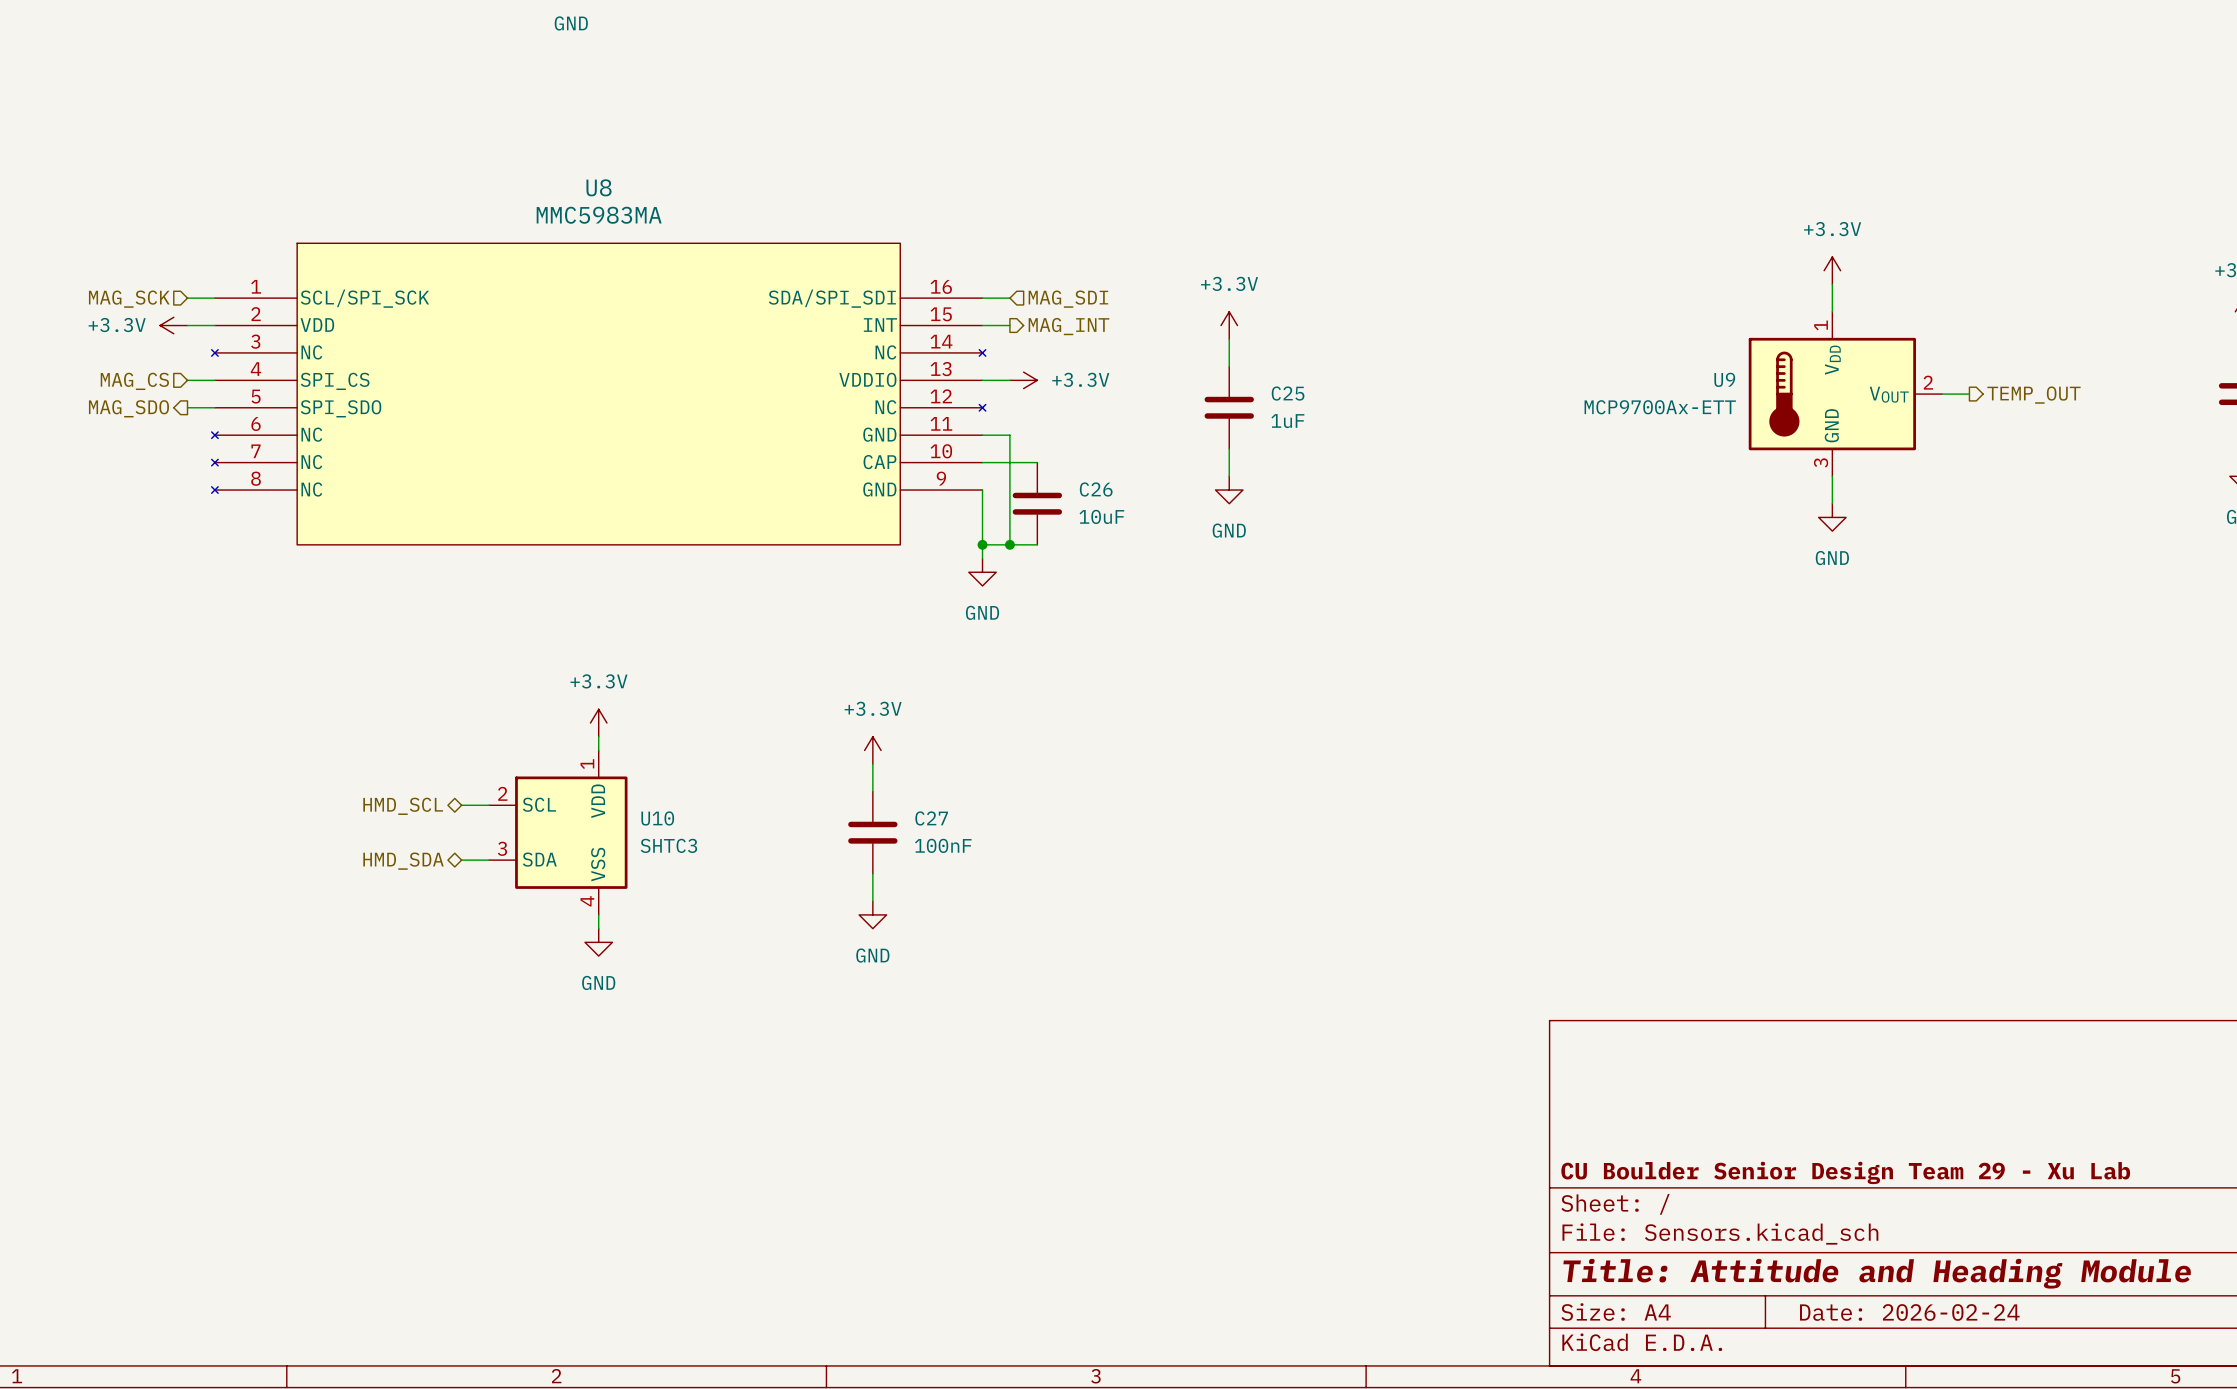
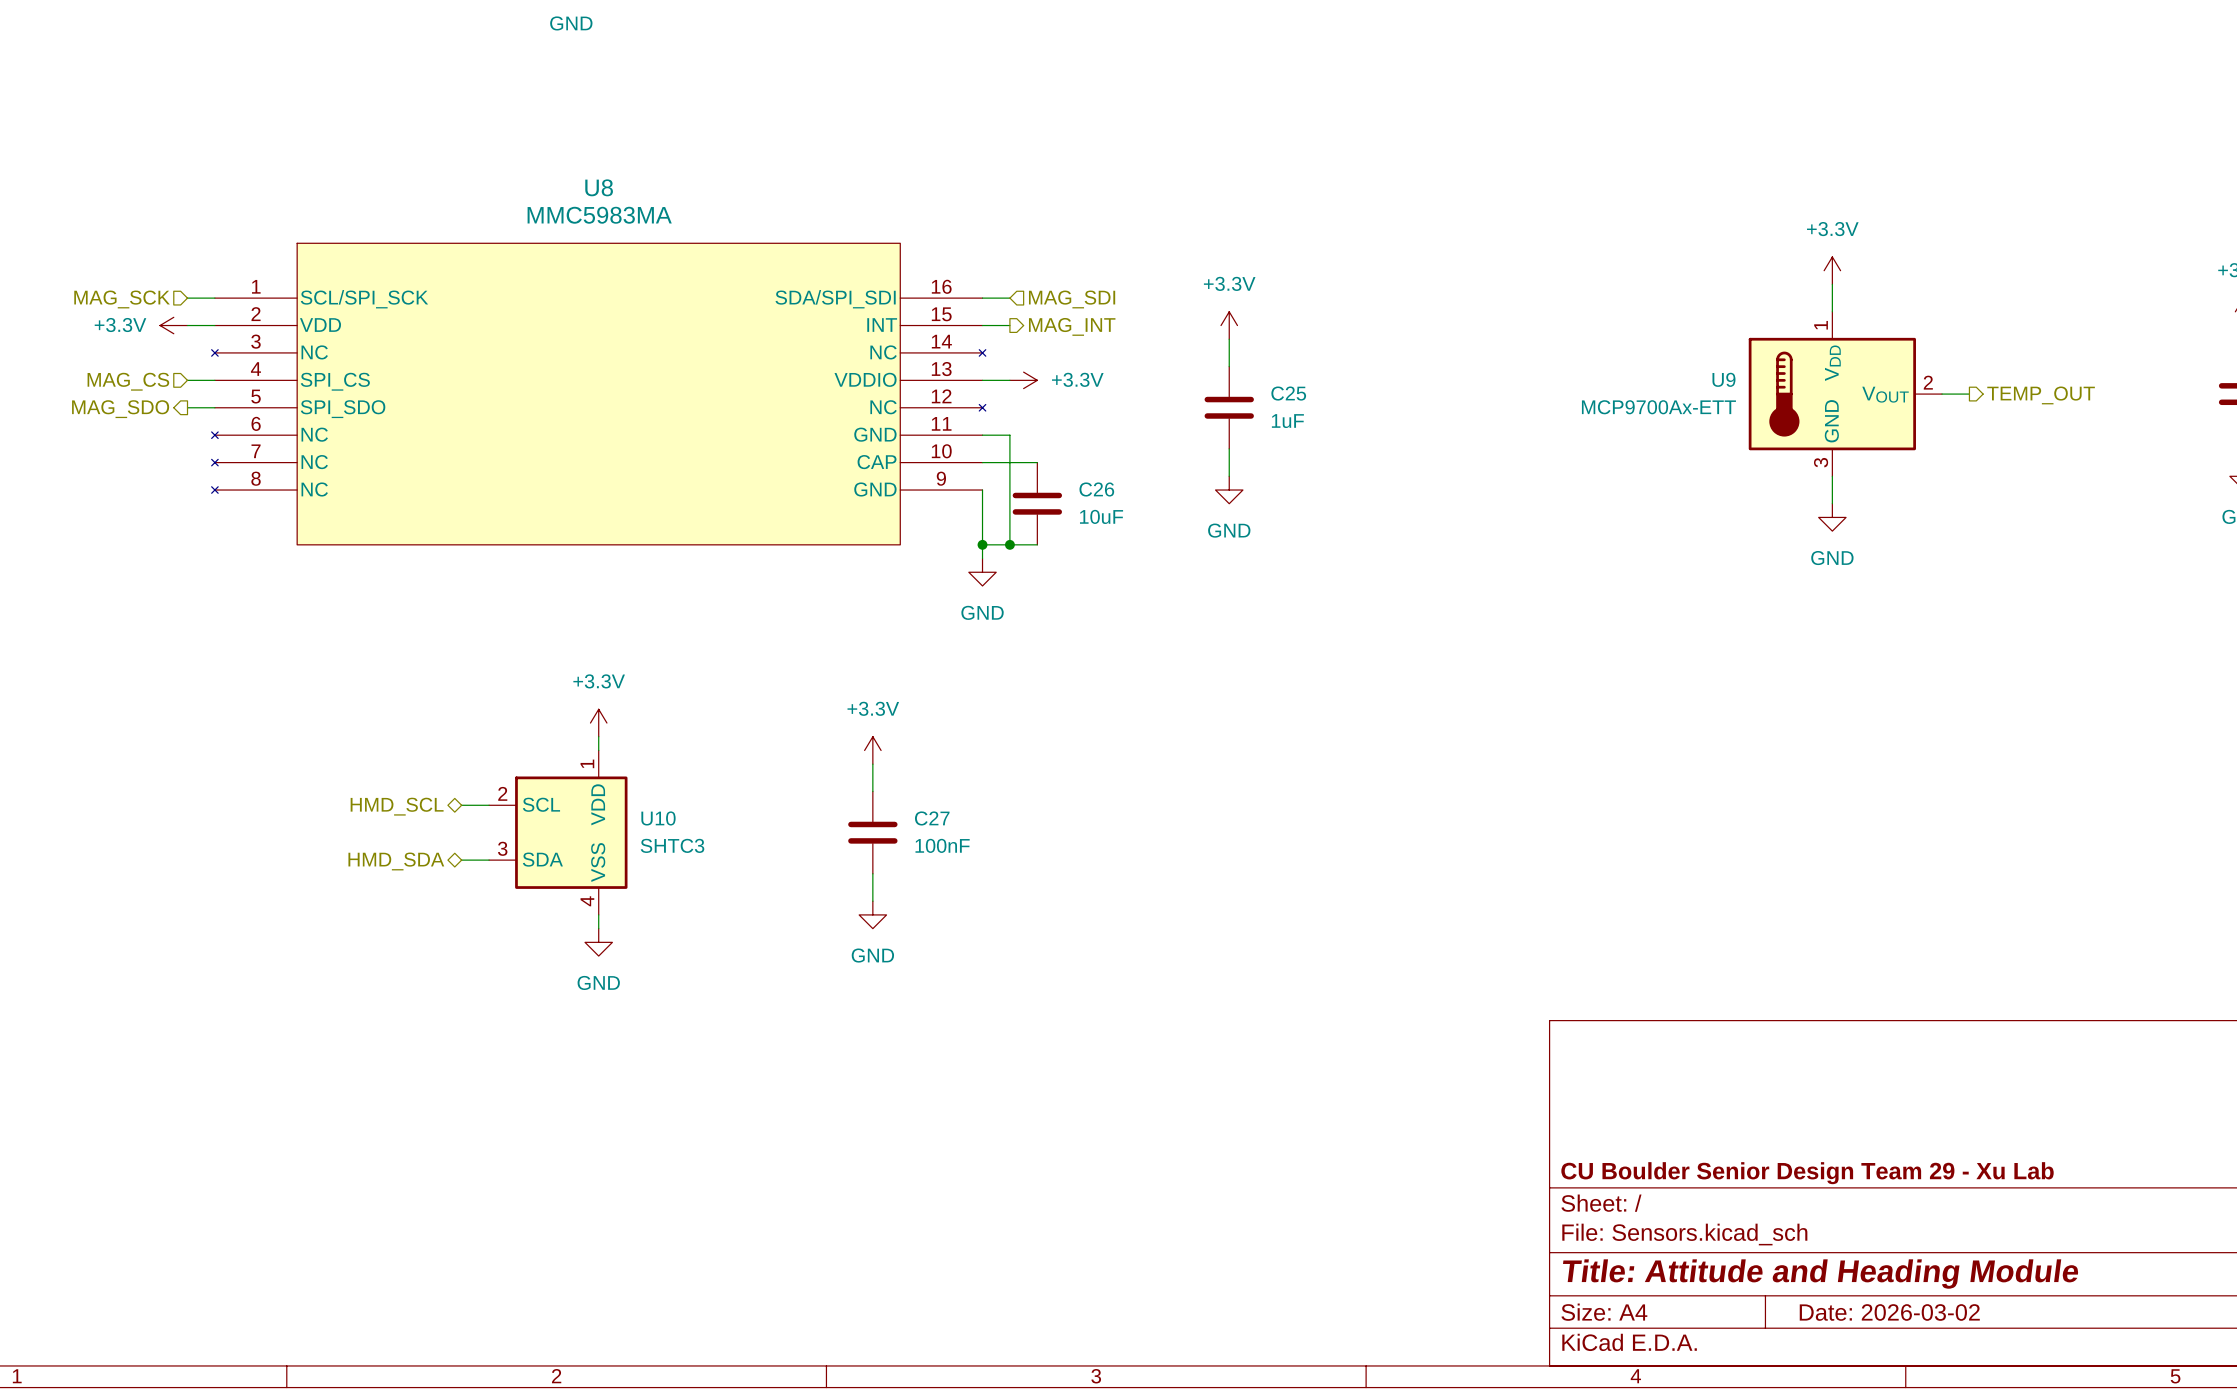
title block: Date: 2026-02-24 (1909, 1312) -> Date: 2026-03-02 (1889, 1312)

